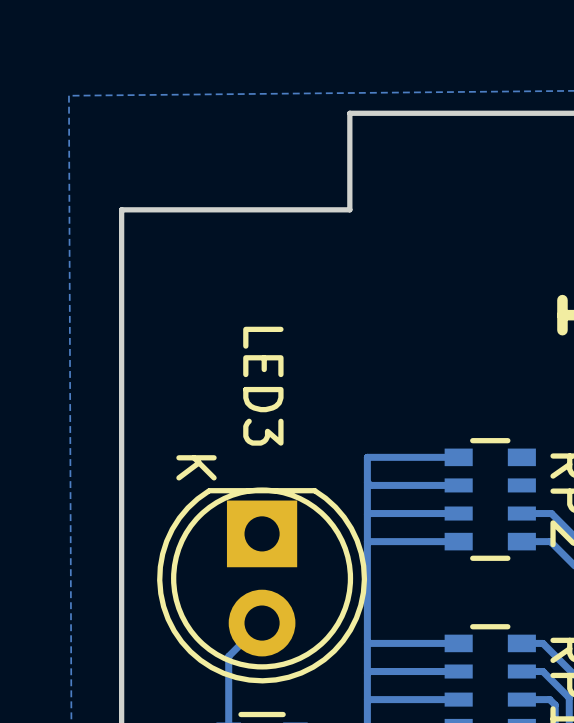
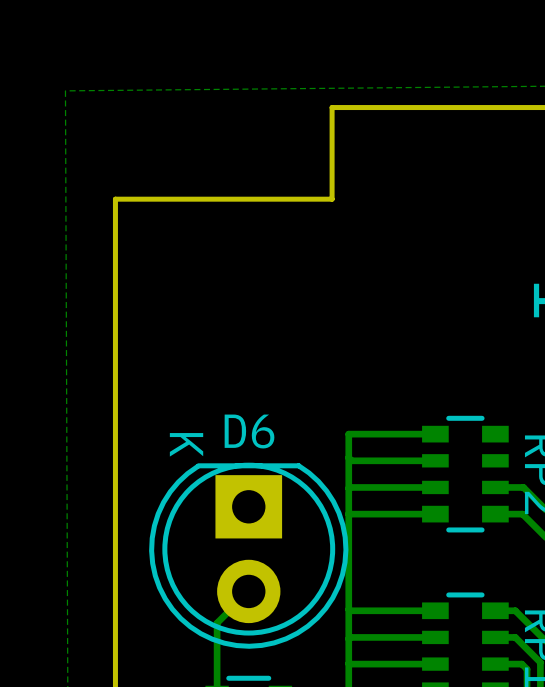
LED3 name: LED3 (263, 386) -> D6 (249, 431)

